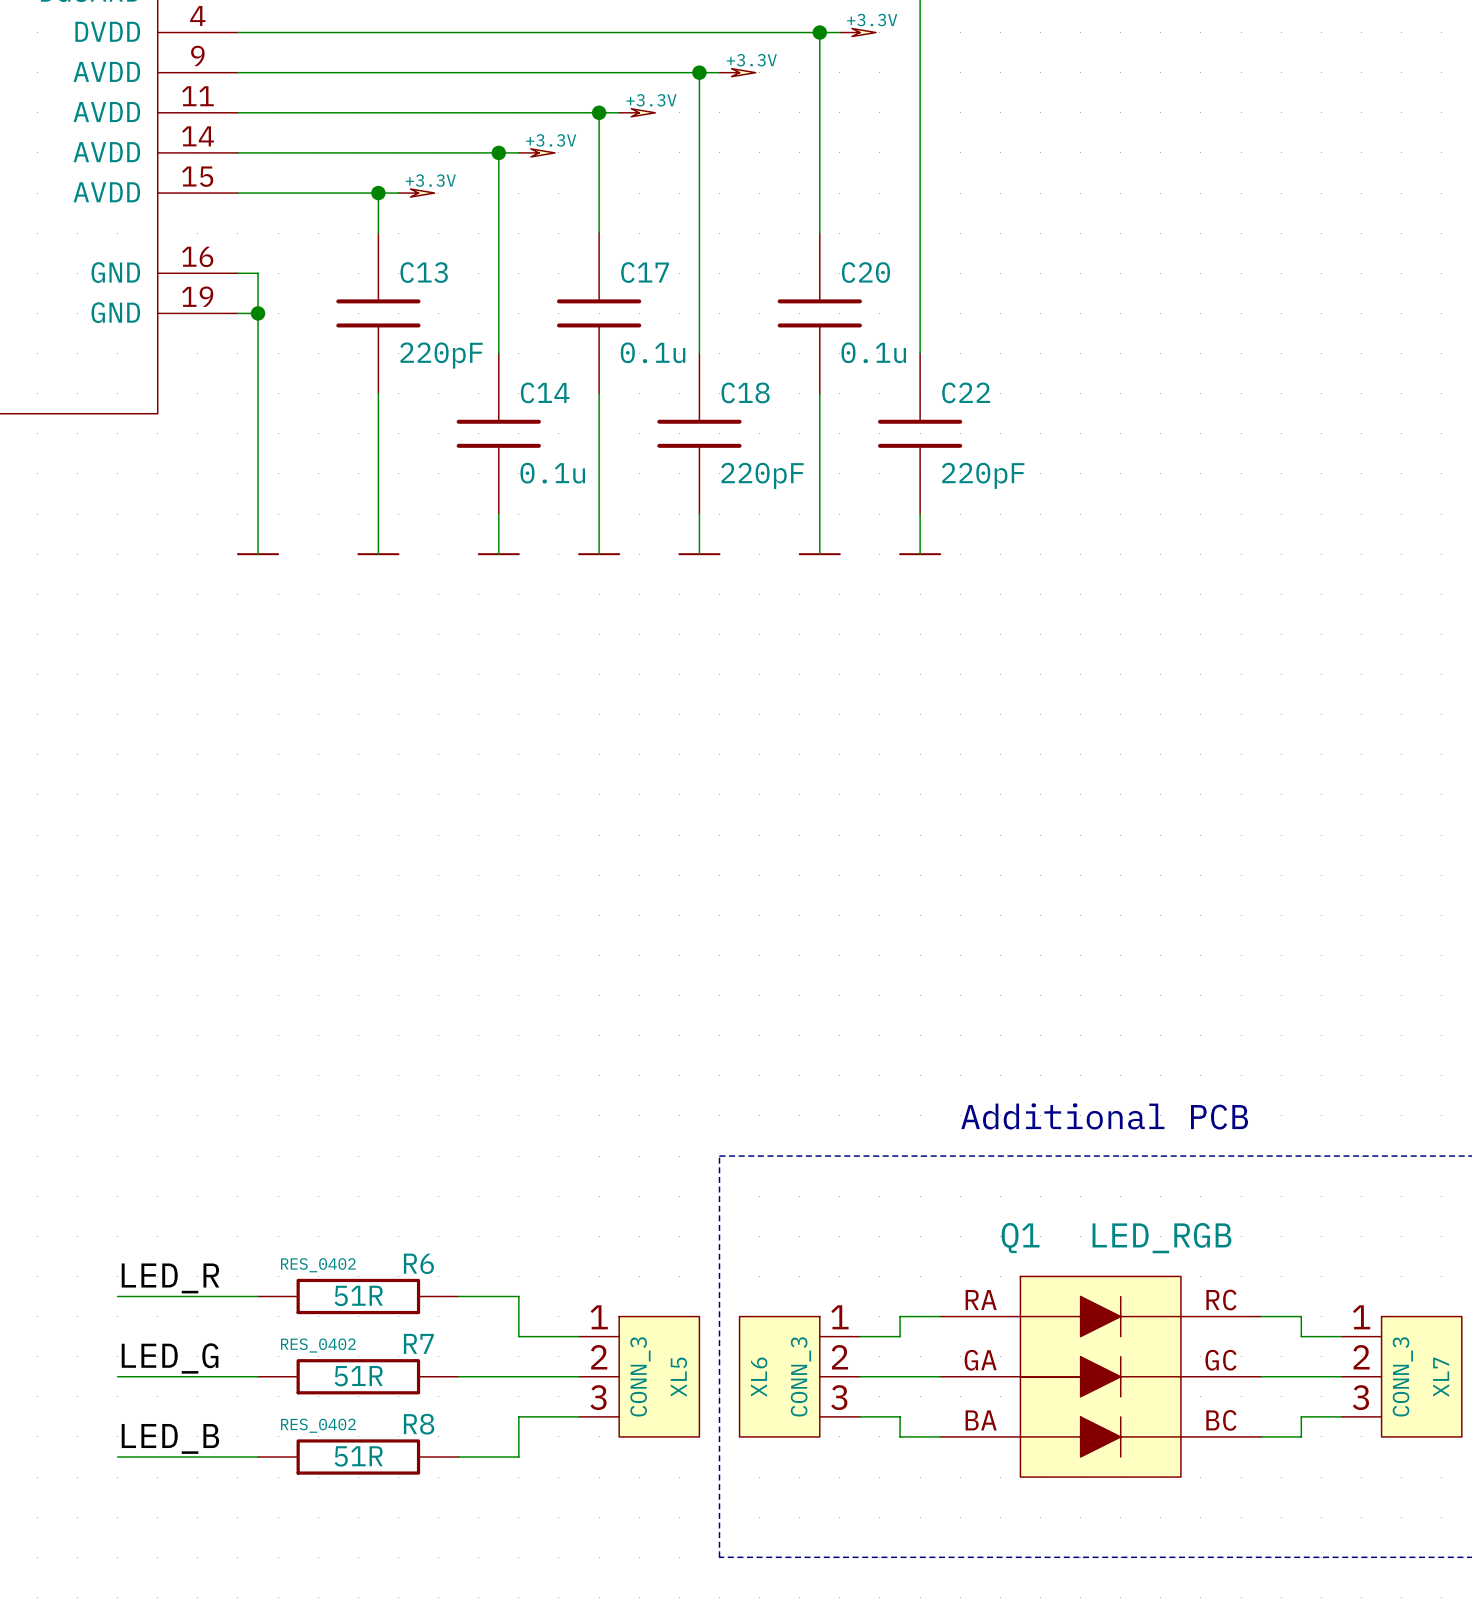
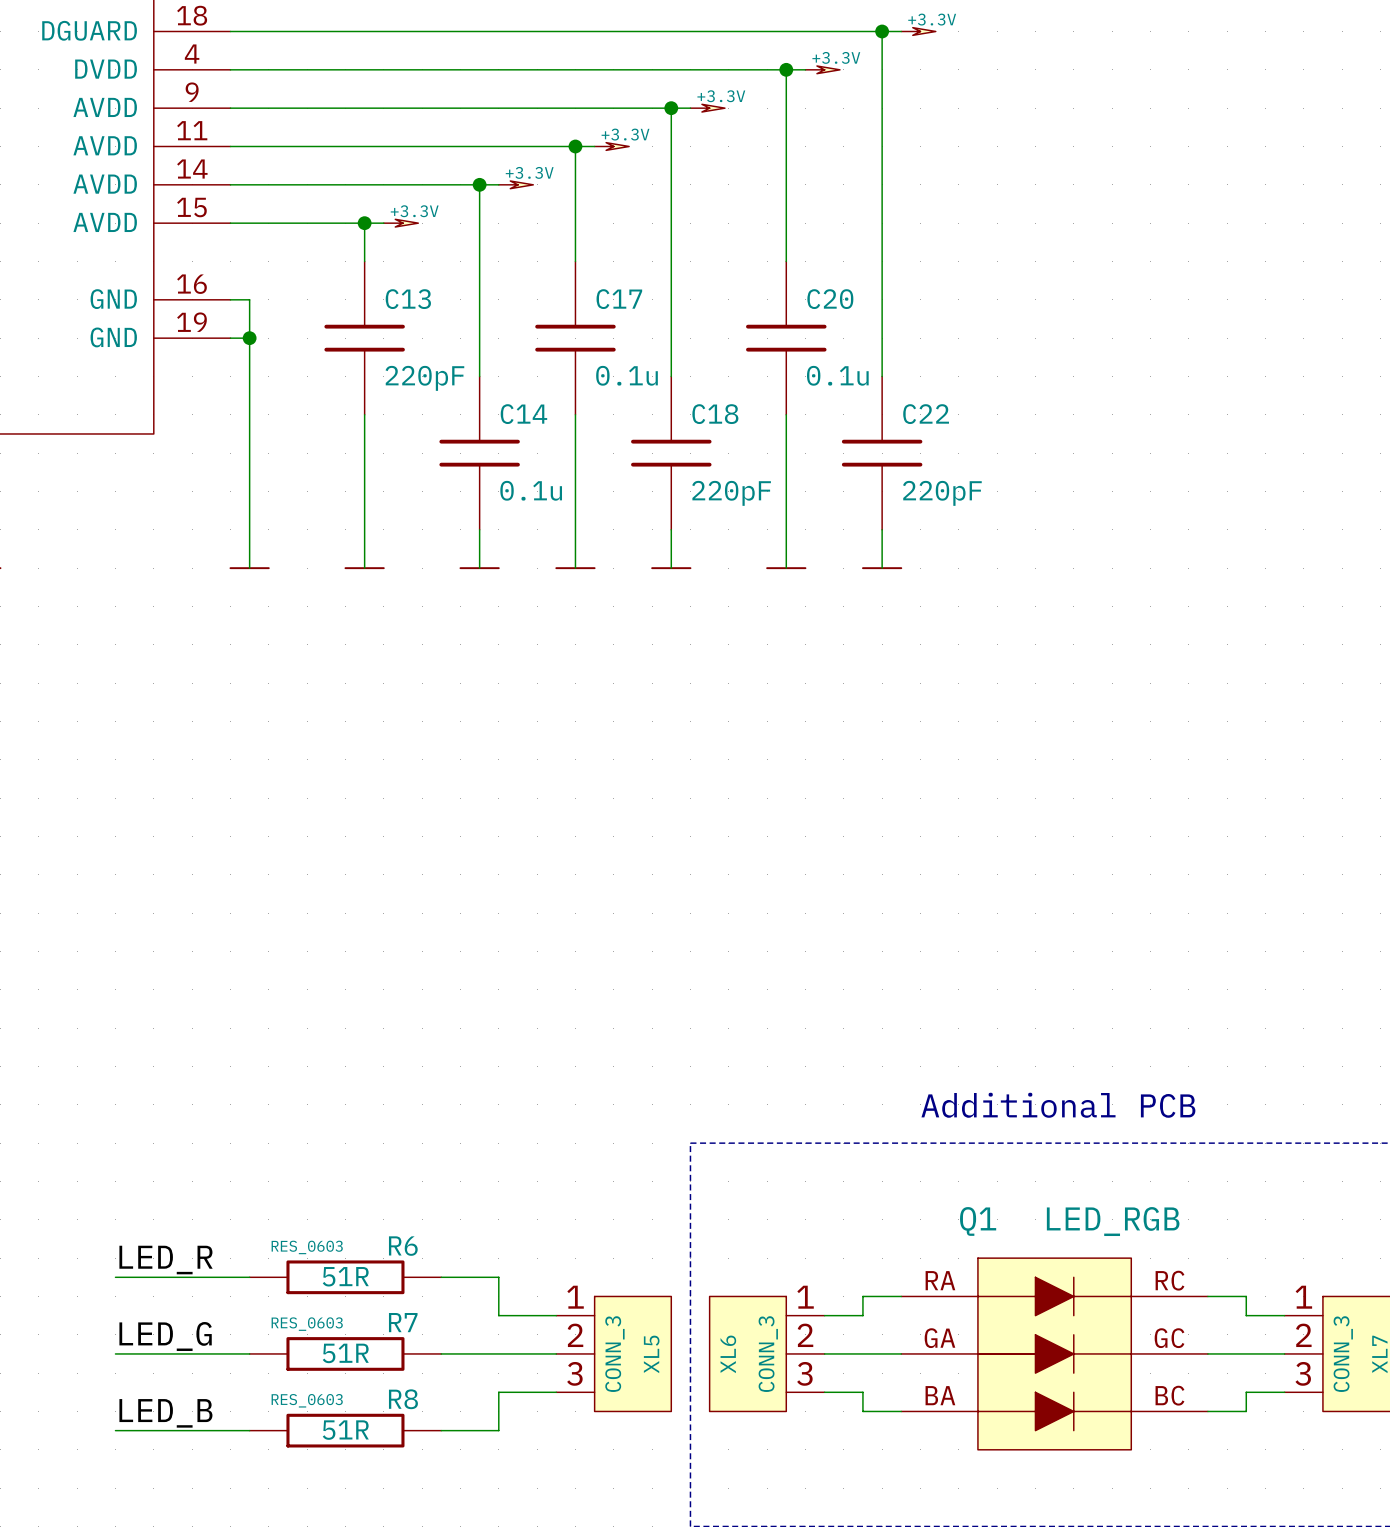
R6 text: RES_0402 (318, 1265) -> RES_0603 (307, 1247)
R7 text: RES_0402 (318, 1345) -> RES_0603 (307, 1324)
R8 text: RES_0402 (318, 1425) -> RES_0603 (307, 1400)

